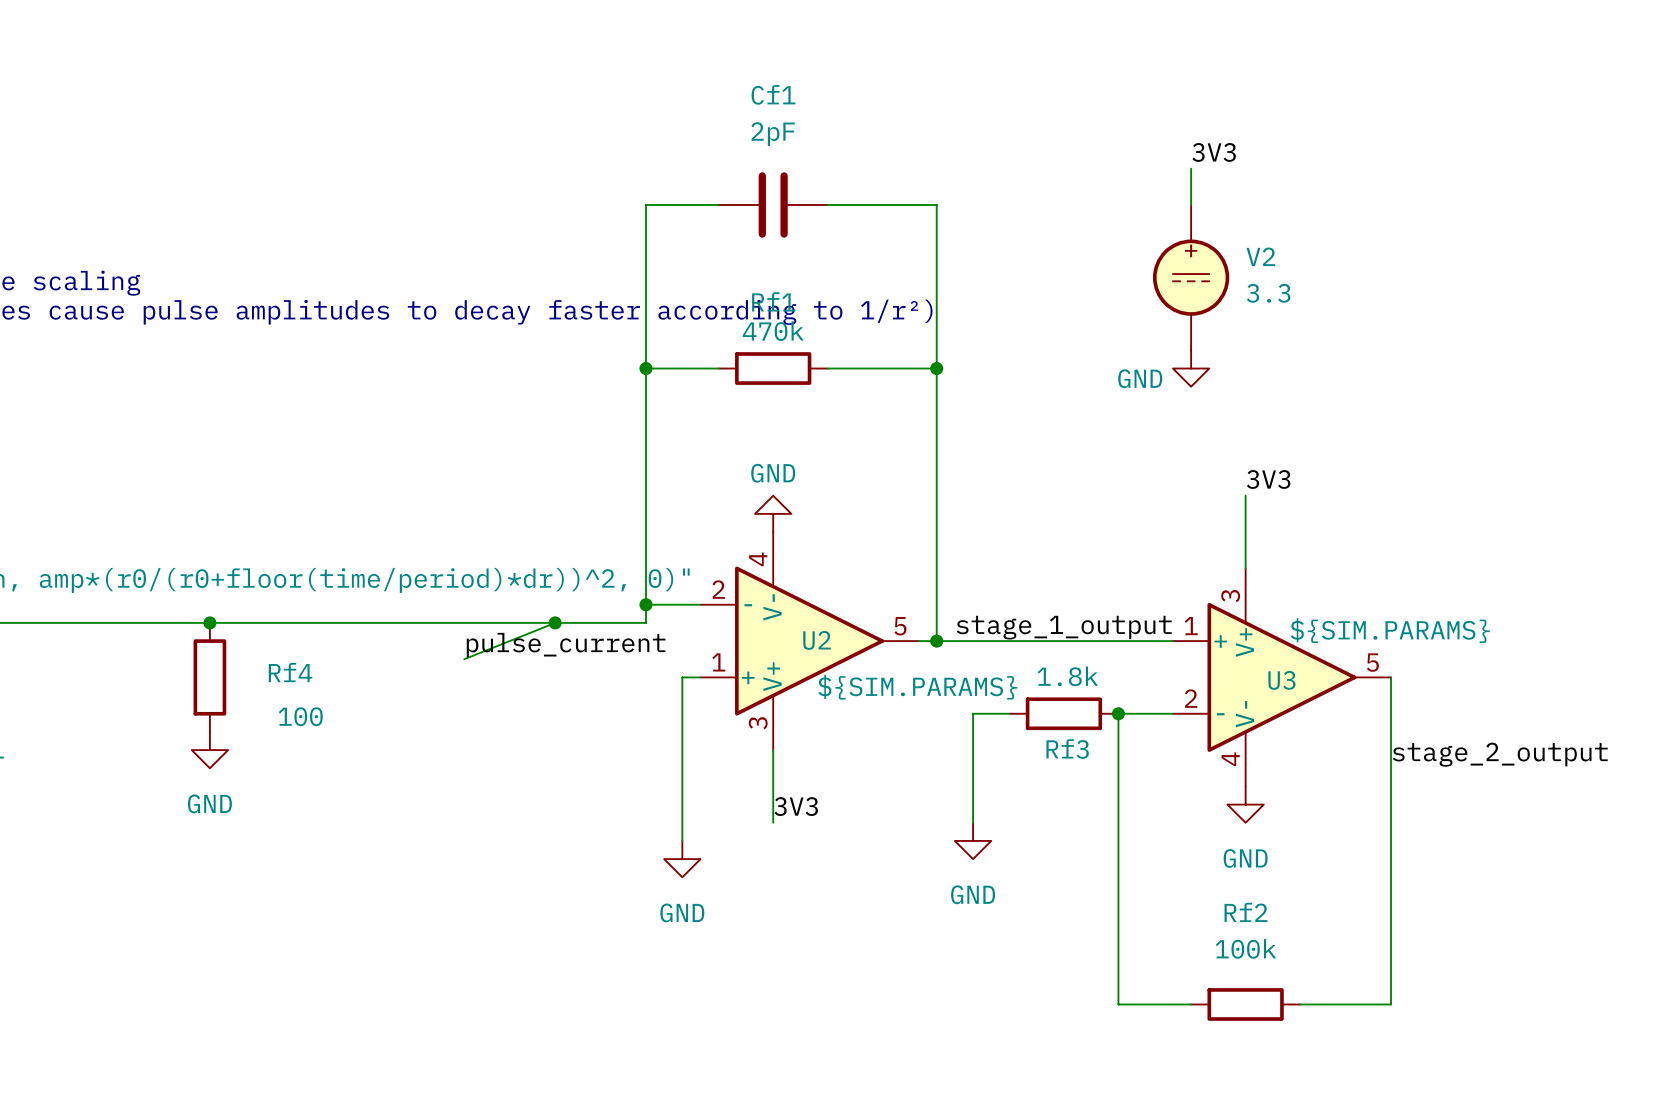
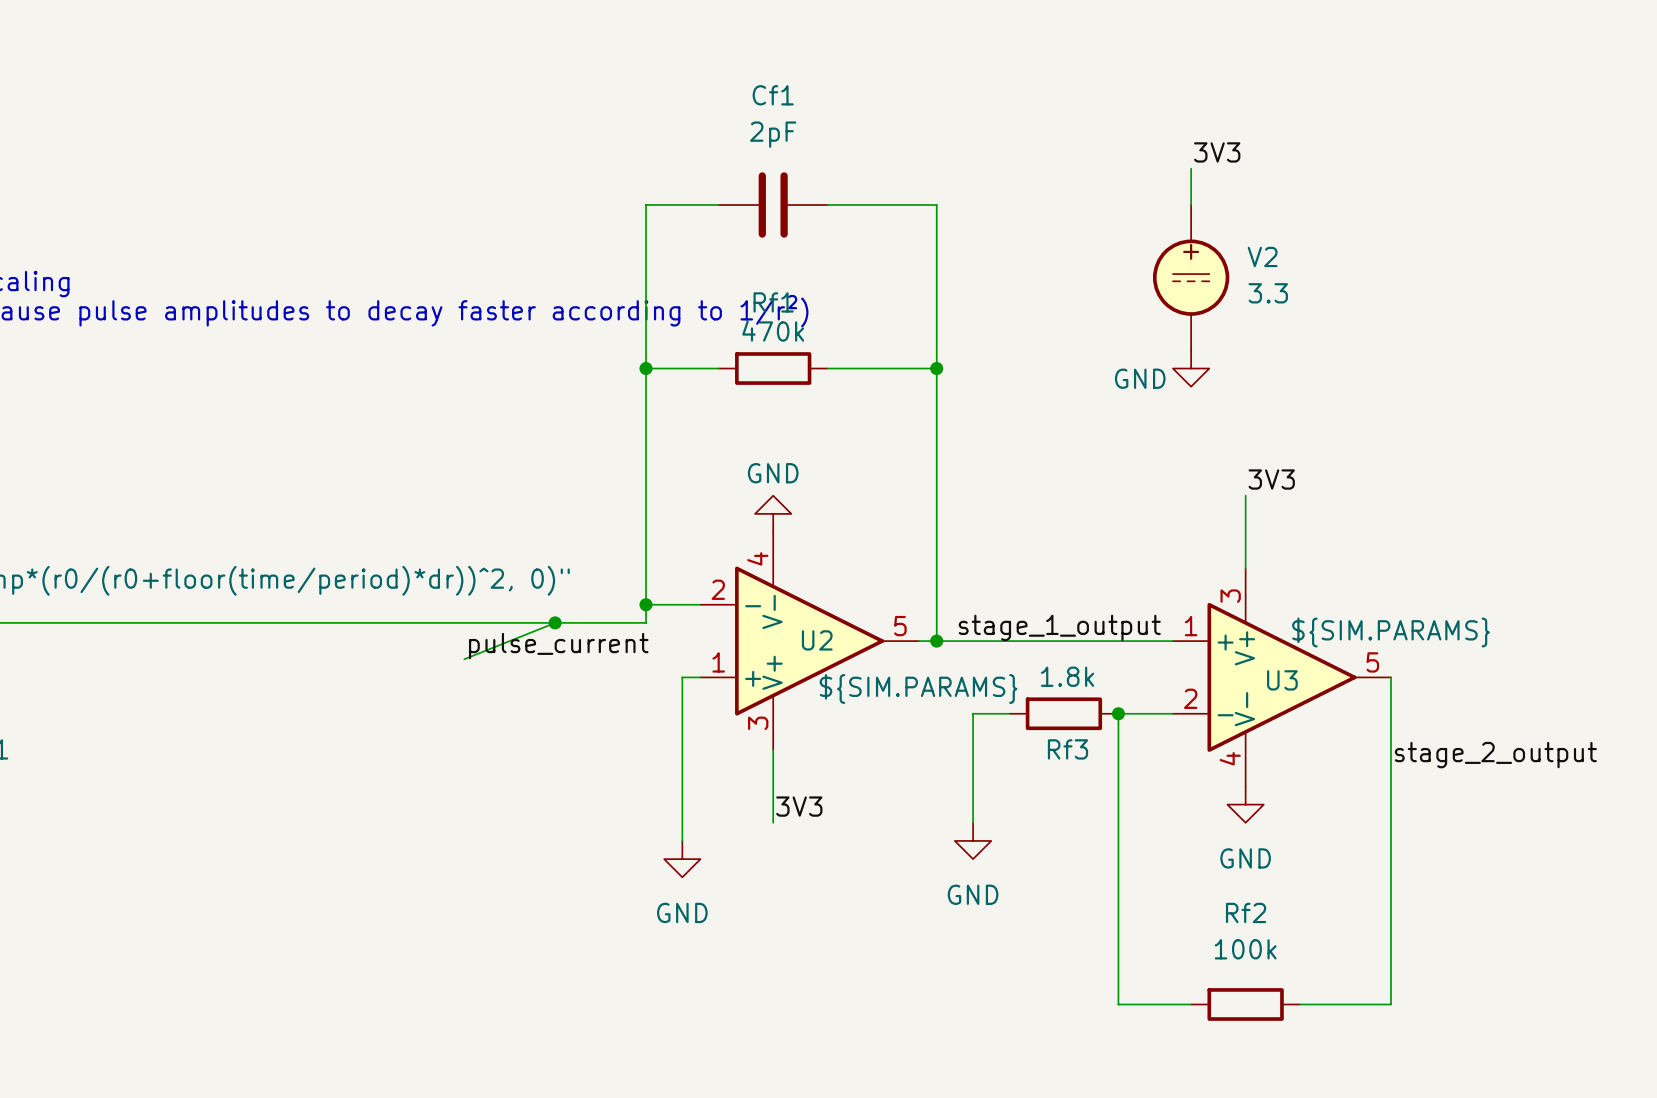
junction: (209, 622) -> none
Rf4: 100 (209, 677) -> none
power symbol: GND (209, 750) -> none

